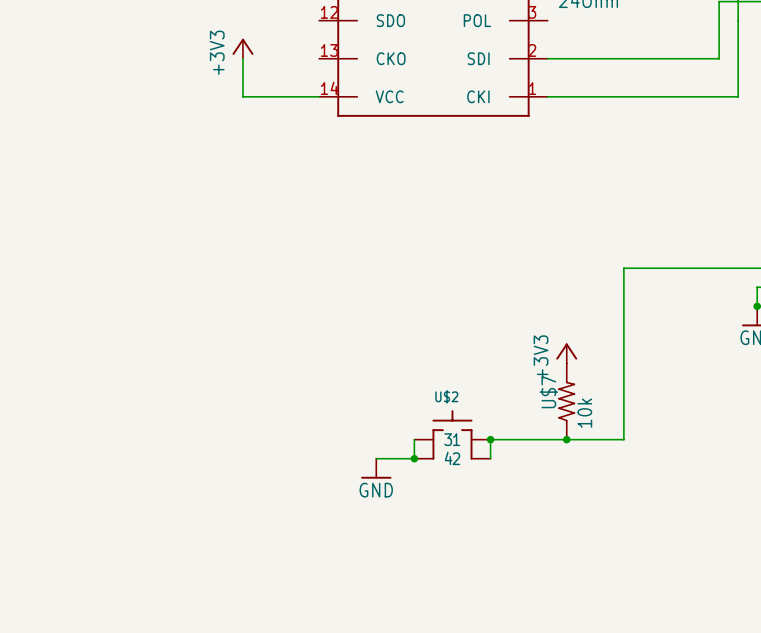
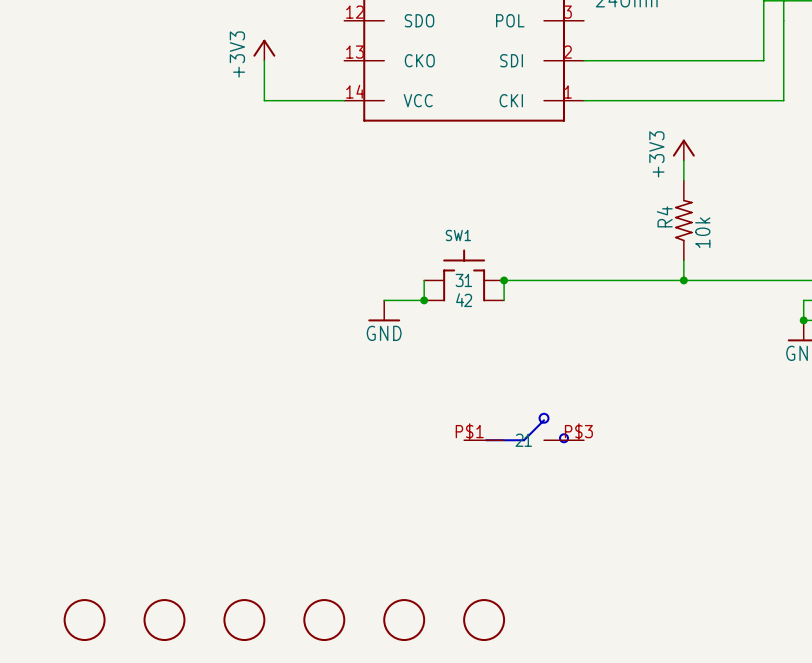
power symbol: none -> +3V3 (683, 150)
wire: none -> (683, 160) (683, 180)
R4: none -> 10k (683, 220)
wire: none -> (683, 260) (683, 280)
SW1: none -> (464, 275)
junction: none -> (504, 280)
wire: (623, 268) (623, 439) (490, 439) (490, 458) -> (663, 280) (504, 280) (504, 300)
junction: none -> (683, 280)
junction: none -> (424, 300)
power symbol: +3V3 (566, 353) -> none
U$7: 10k (566, 401) -> none
part: none -> (524, 428)
U$2: (452, 434) -> none
wire: (414, 439) (414, 458) (376, 458) -> (424, 280) (424, 300) (384, 300)
junction: (490, 439) -> none
junction: (566, 439) -> none
junction: (414, 458) -> none
power symbol position: GND (376, 468) -> GND (384, 310)
part: none -> (84, 620)
part: none -> (164, 620)
part: none -> (244, 620)
part: none -> (324, 620)
part: none -> (404, 620)
part: none -> (484, 620)

